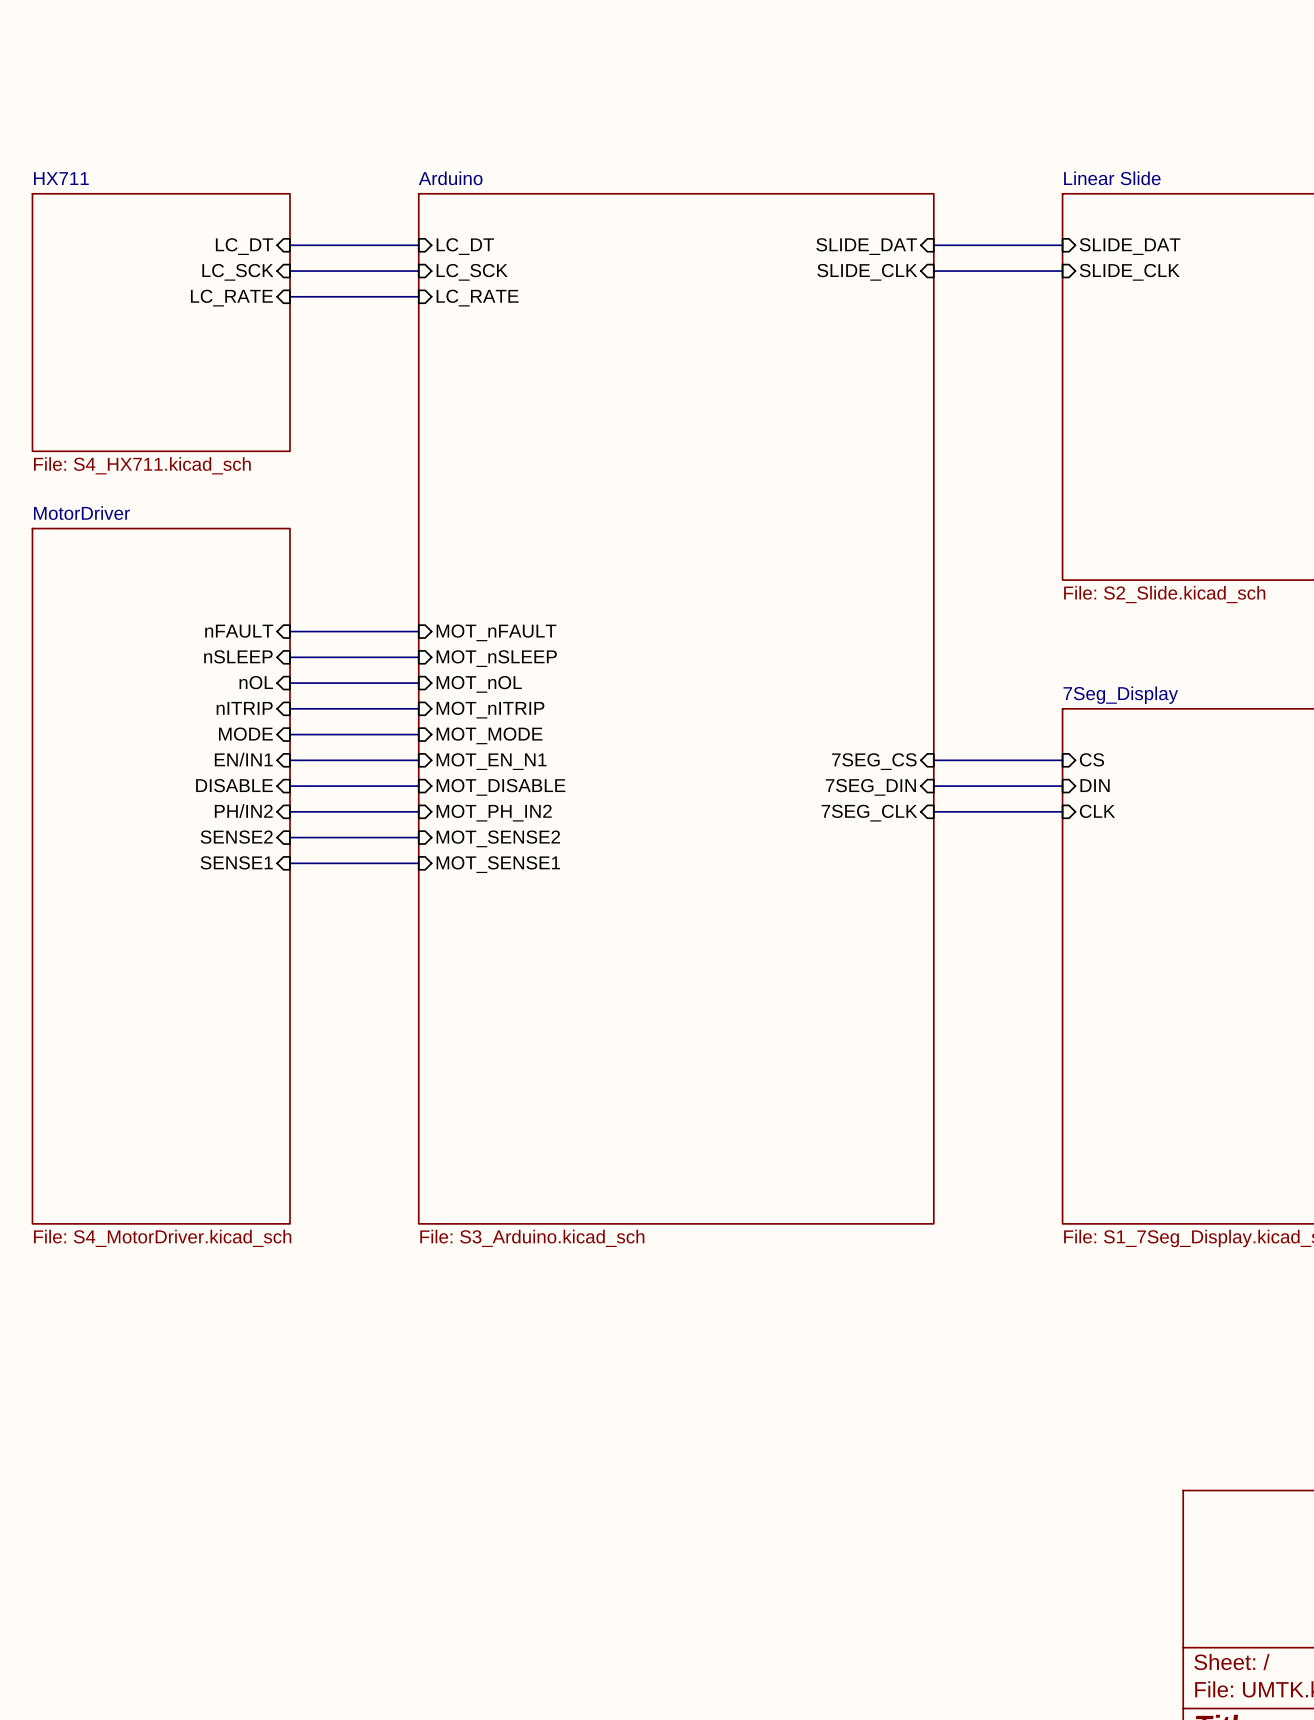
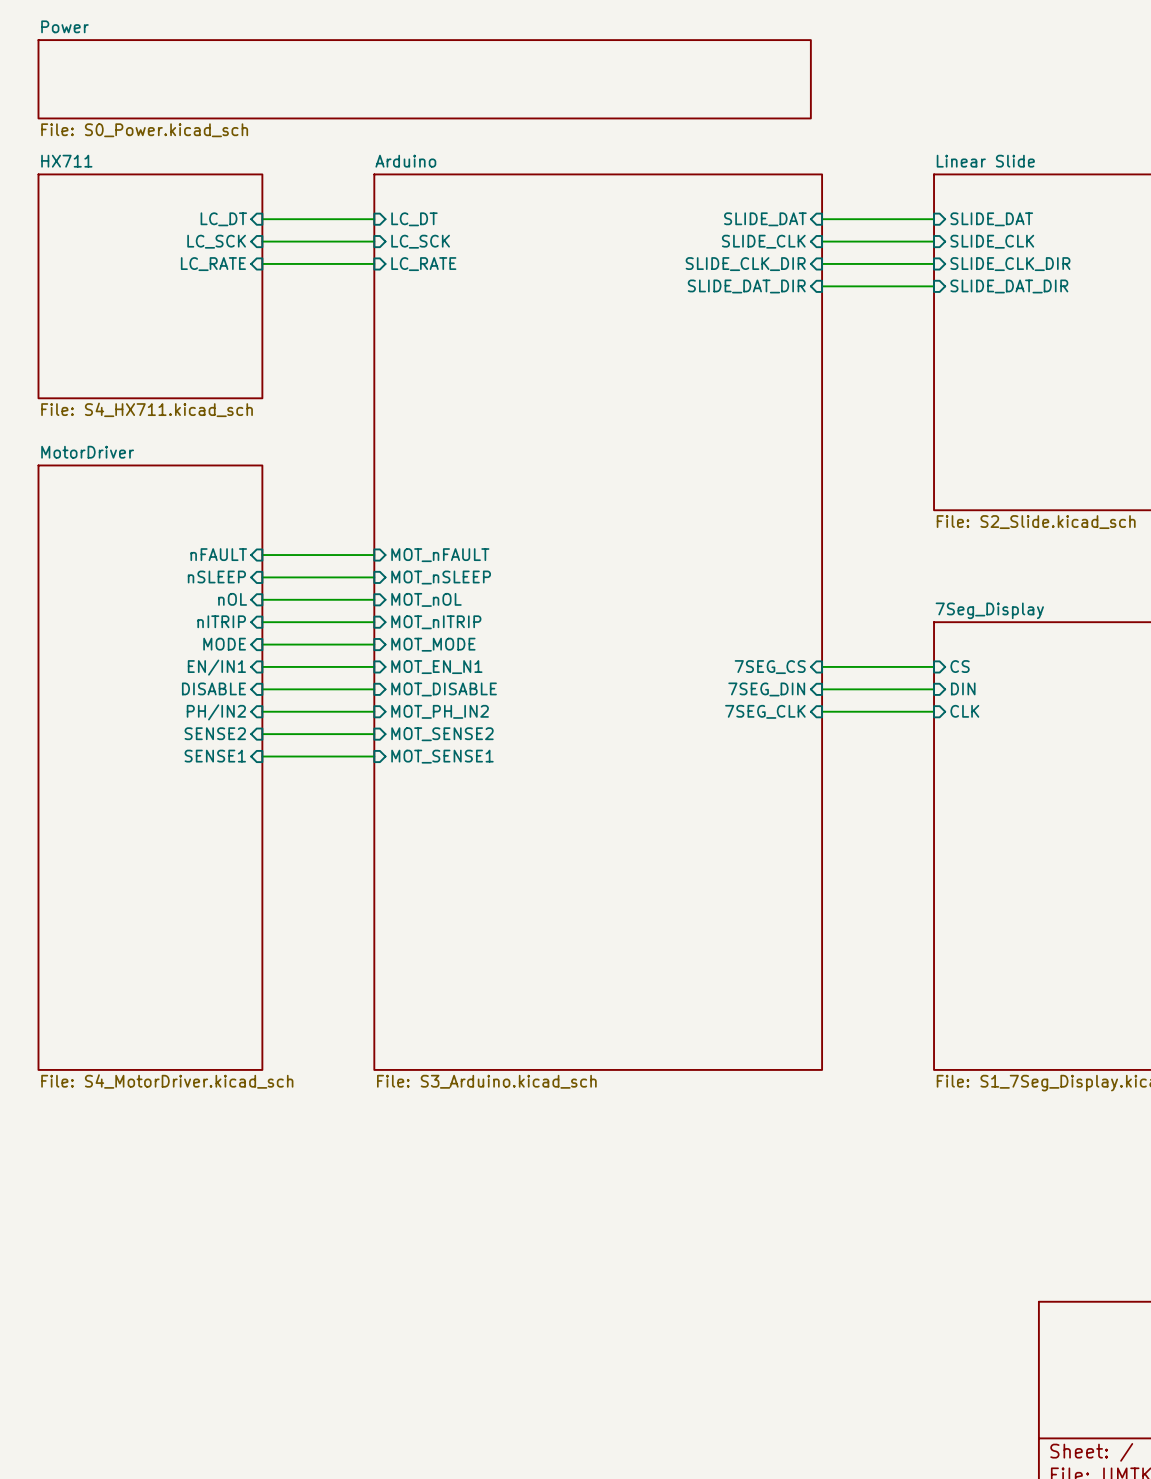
sheet Power: none -> File: S0_Power.kicad_sch (424, 79)
wire: none -> (822, 263) (934, 263)
sheet pin: none -> SLIDE_CLK_DIR (745, 264)
sheet pin: none -> SLIDE_CLK_DIR (1010, 264)
wire: none -> (822, 286) (934, 286)
sheet pin: none -> SLIDE_DAT_DIR (746, 286)
sheet pin: none -> SLIDE_DAT_DIR (1009, 286)

